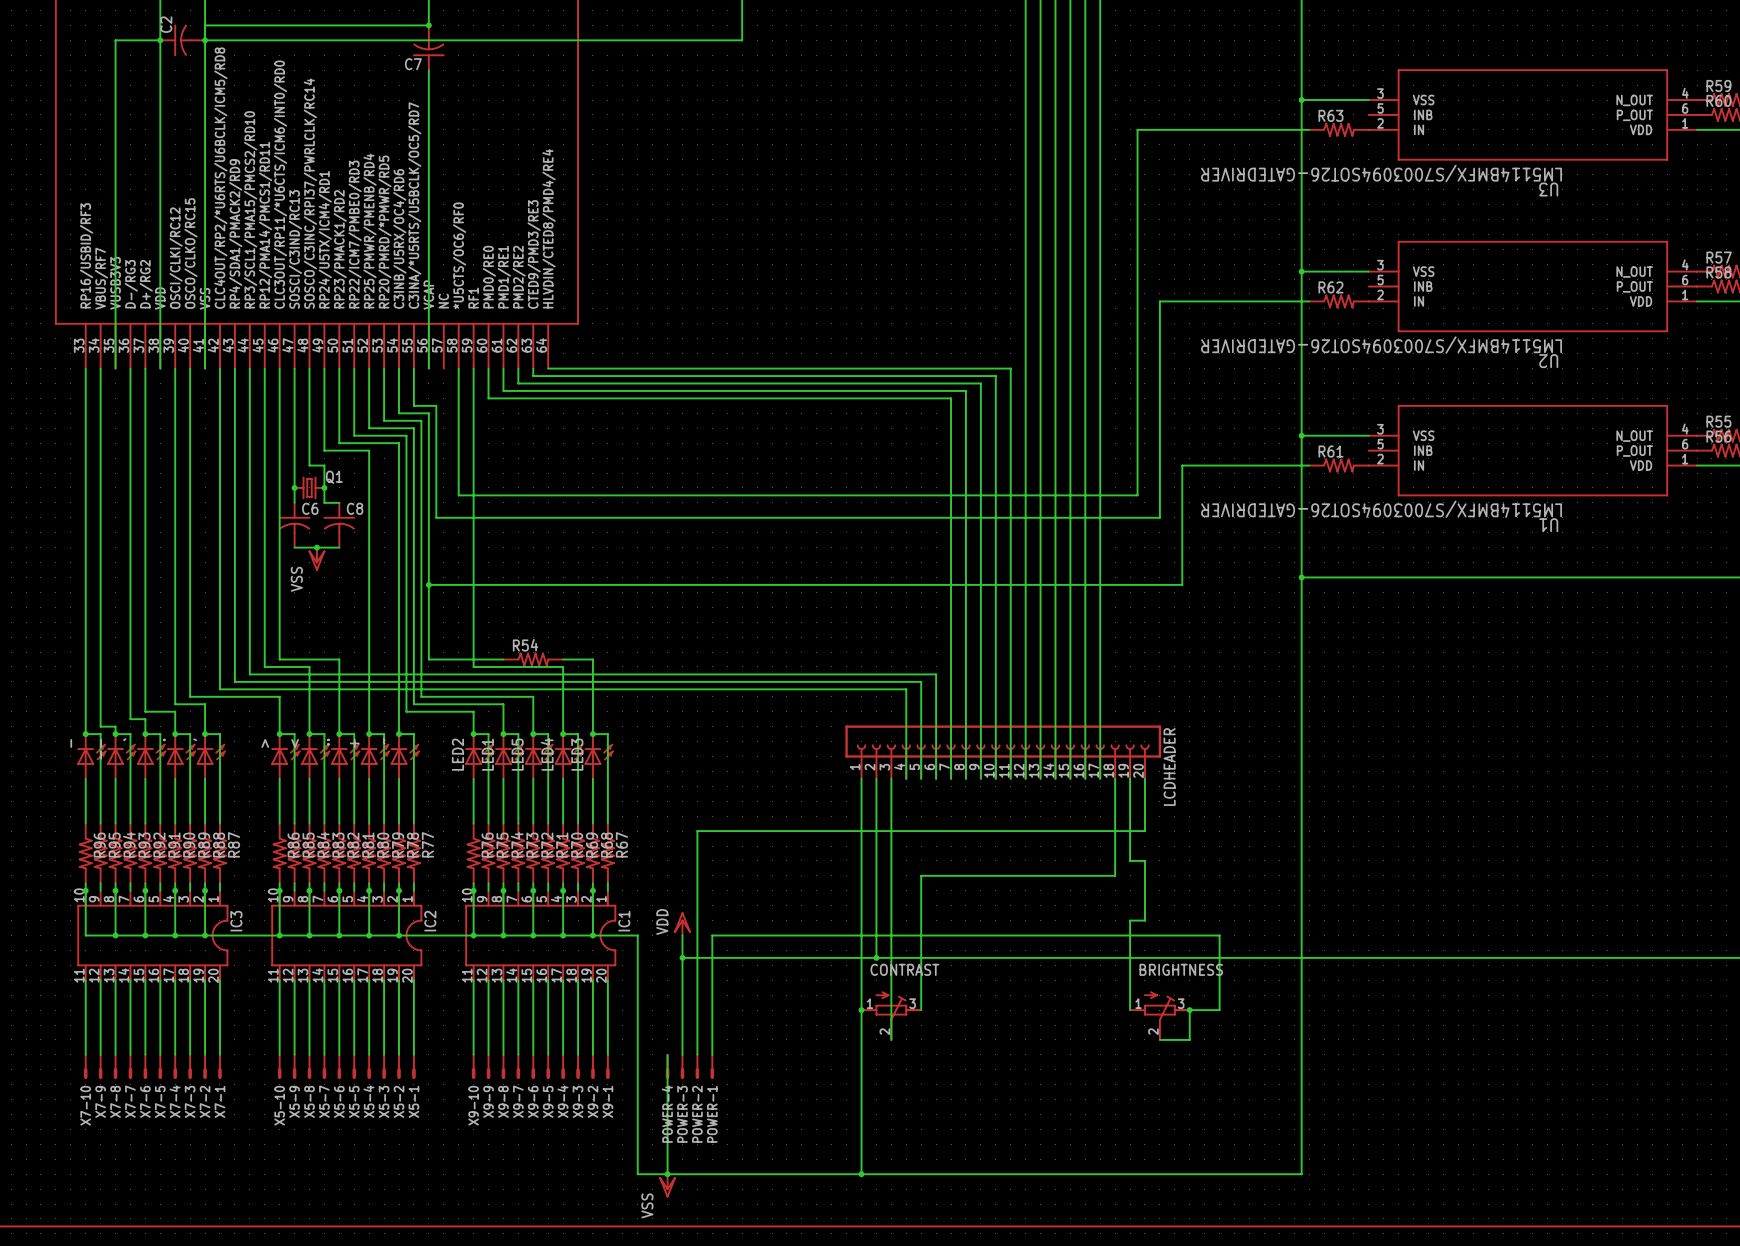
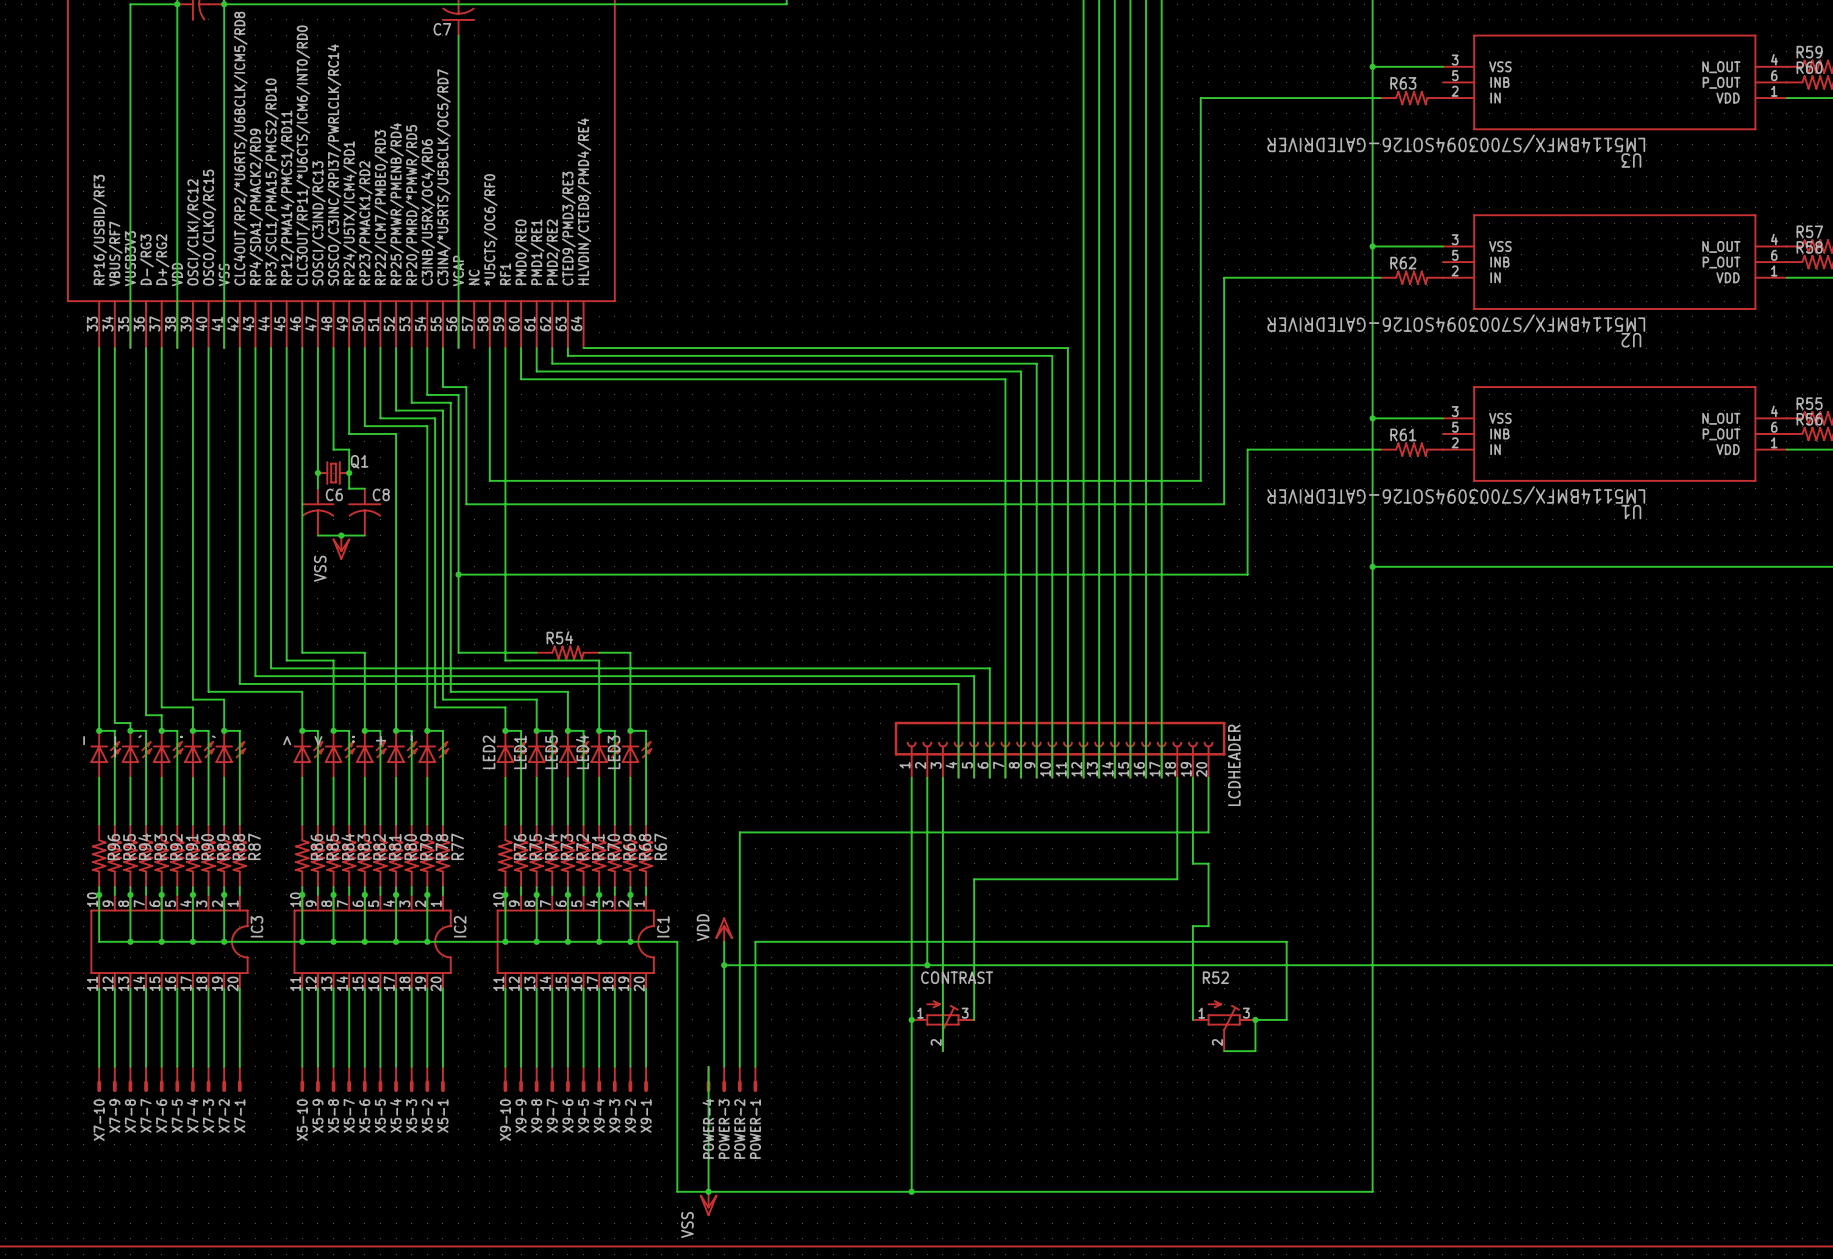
BRIGHTNESS name: BRIGHTNESS (1181, 969) -> R52 (1215, 977)

